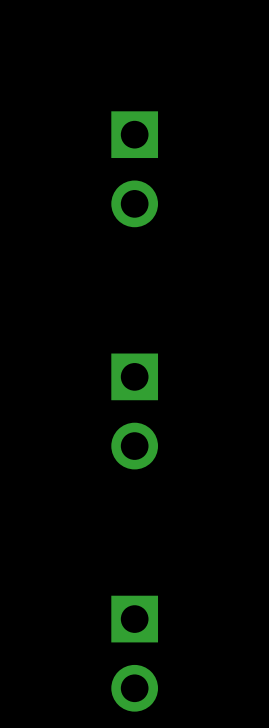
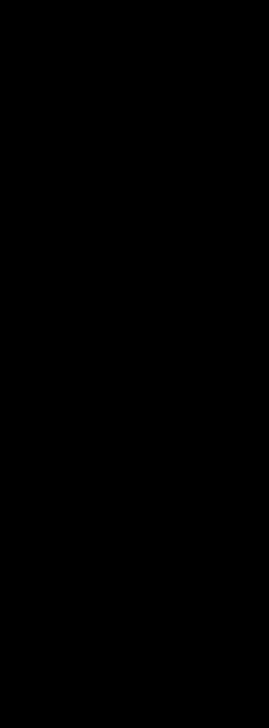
part: (134, 169) -> none
part: (134, 411) -> none
part: (134, 653) -> none

